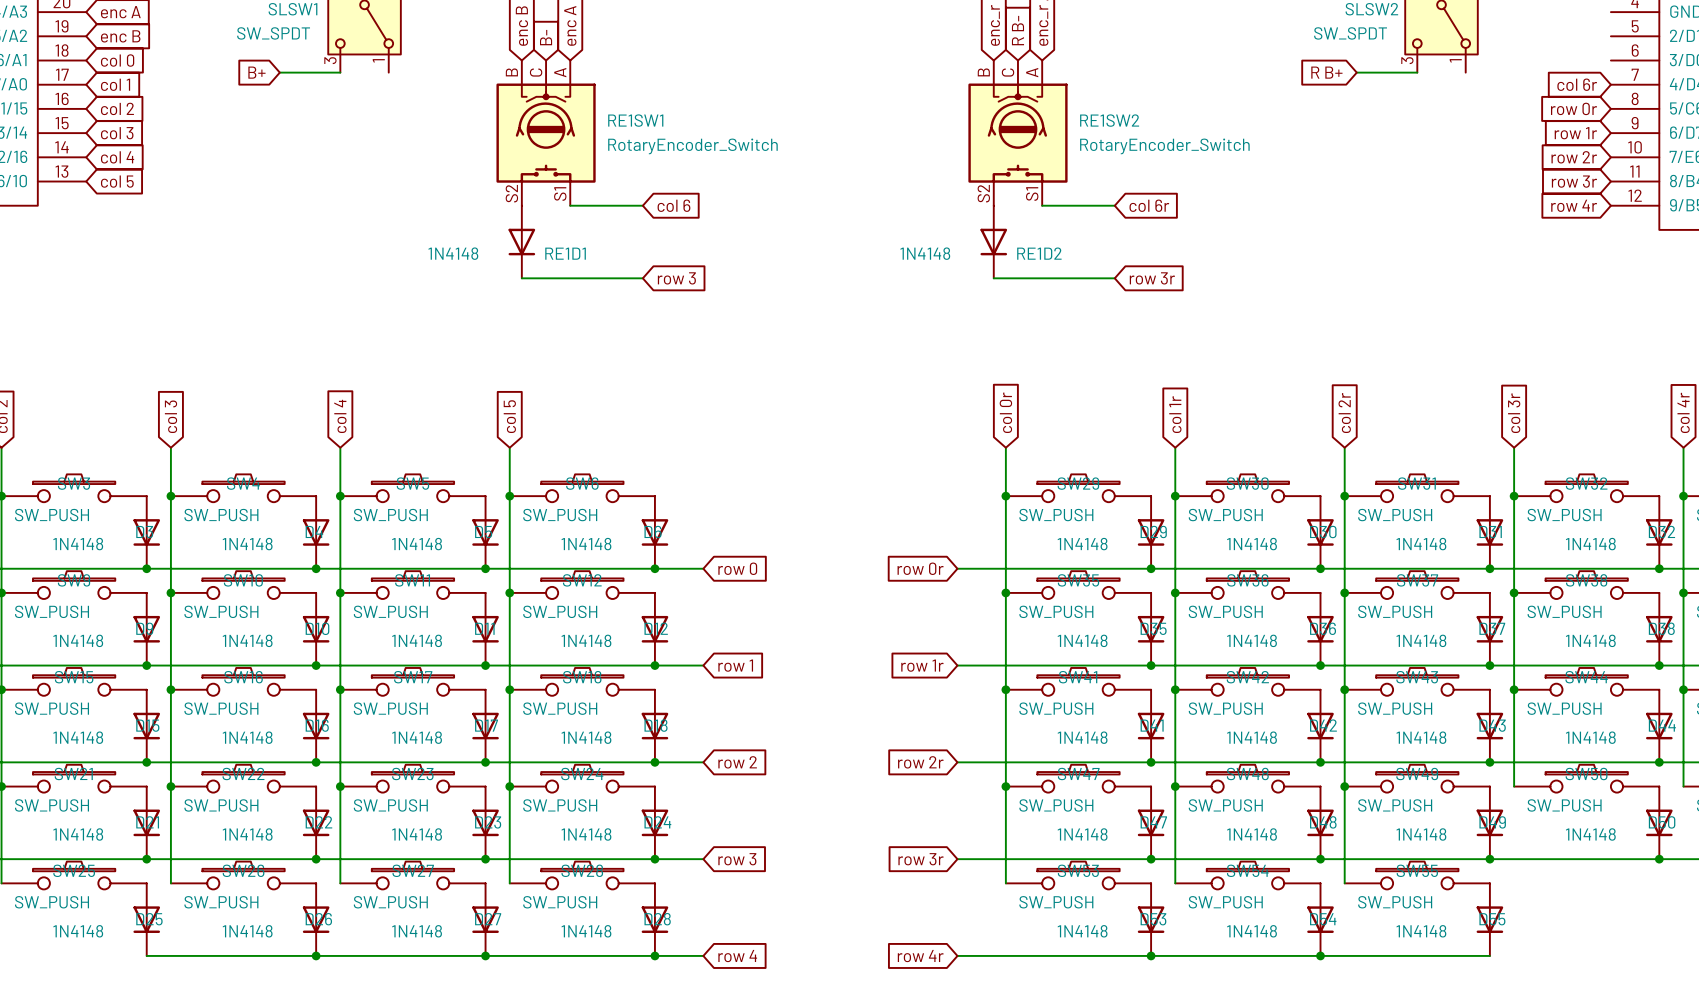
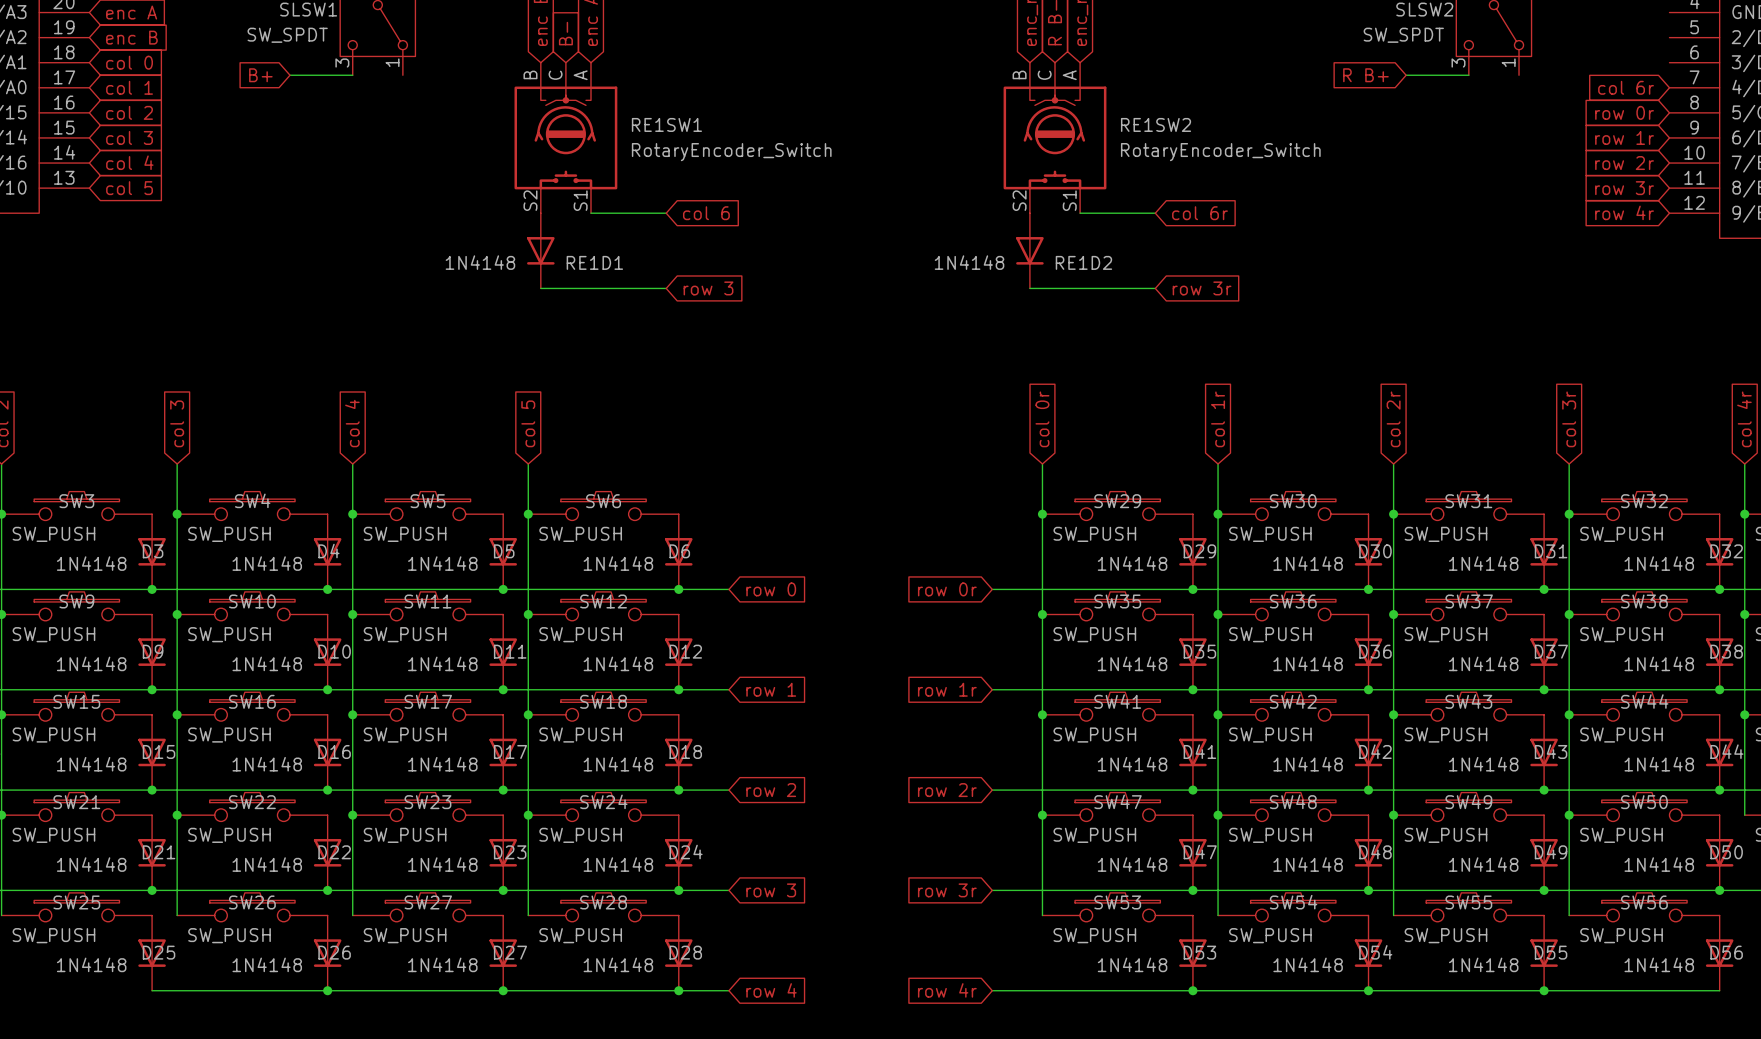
wire: none -> (1569, 815) (1569, 915)
junction: none -> (1569, 815)
SW56: none -> SW_PUSH (1644, 907)
D56: none -> 1N4148 (1719, 953)
wire: none -> (1544, 990) (1719, 990)
junction: none -> (1544, 990)

